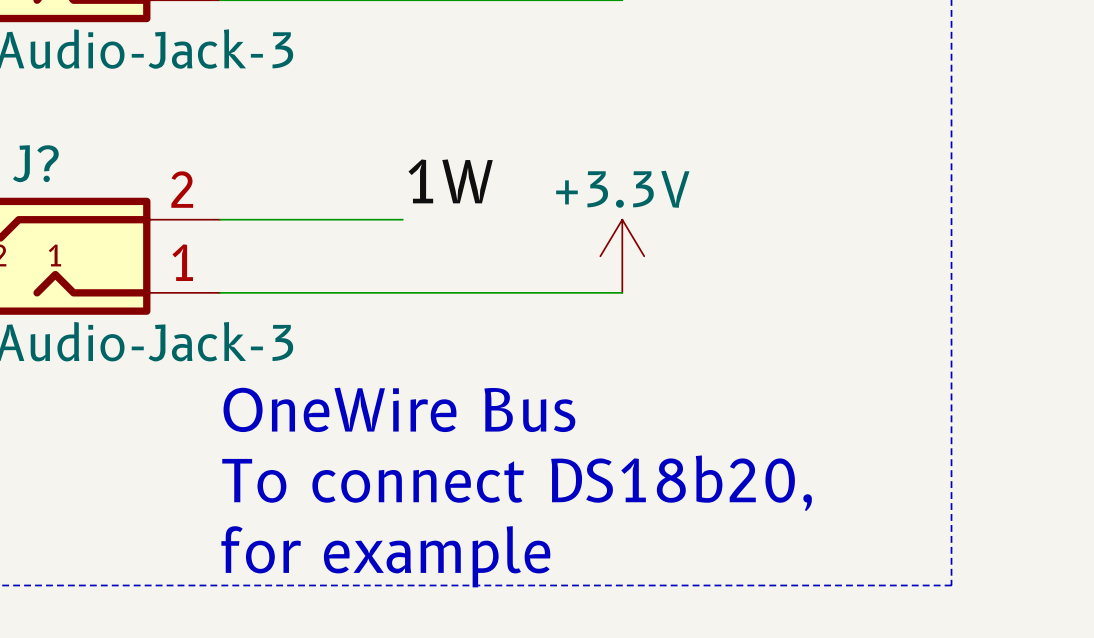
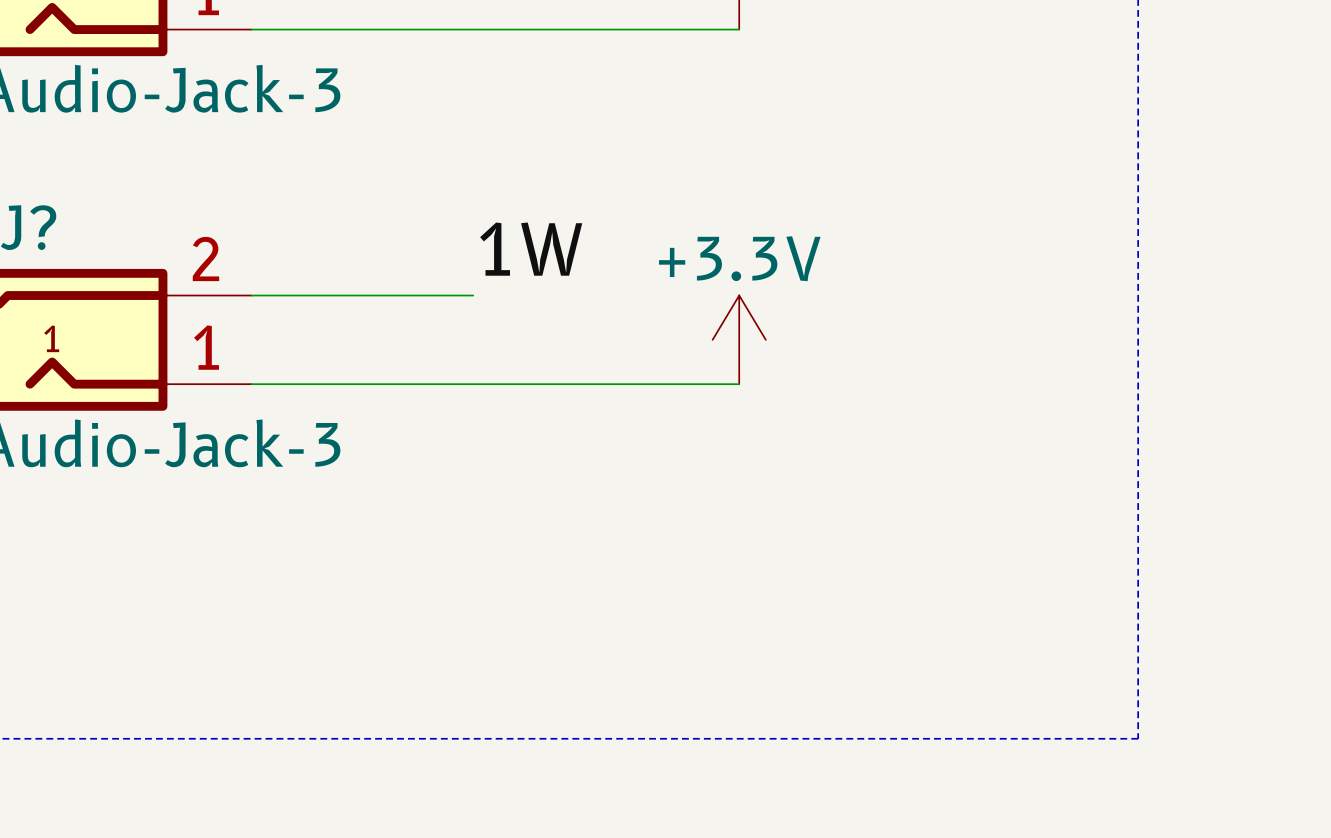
text: OneWire Bus (399, 409) -> none
text: To connect DS18b20, (517, 483) -> none
text: for example (385, 556) -> none

